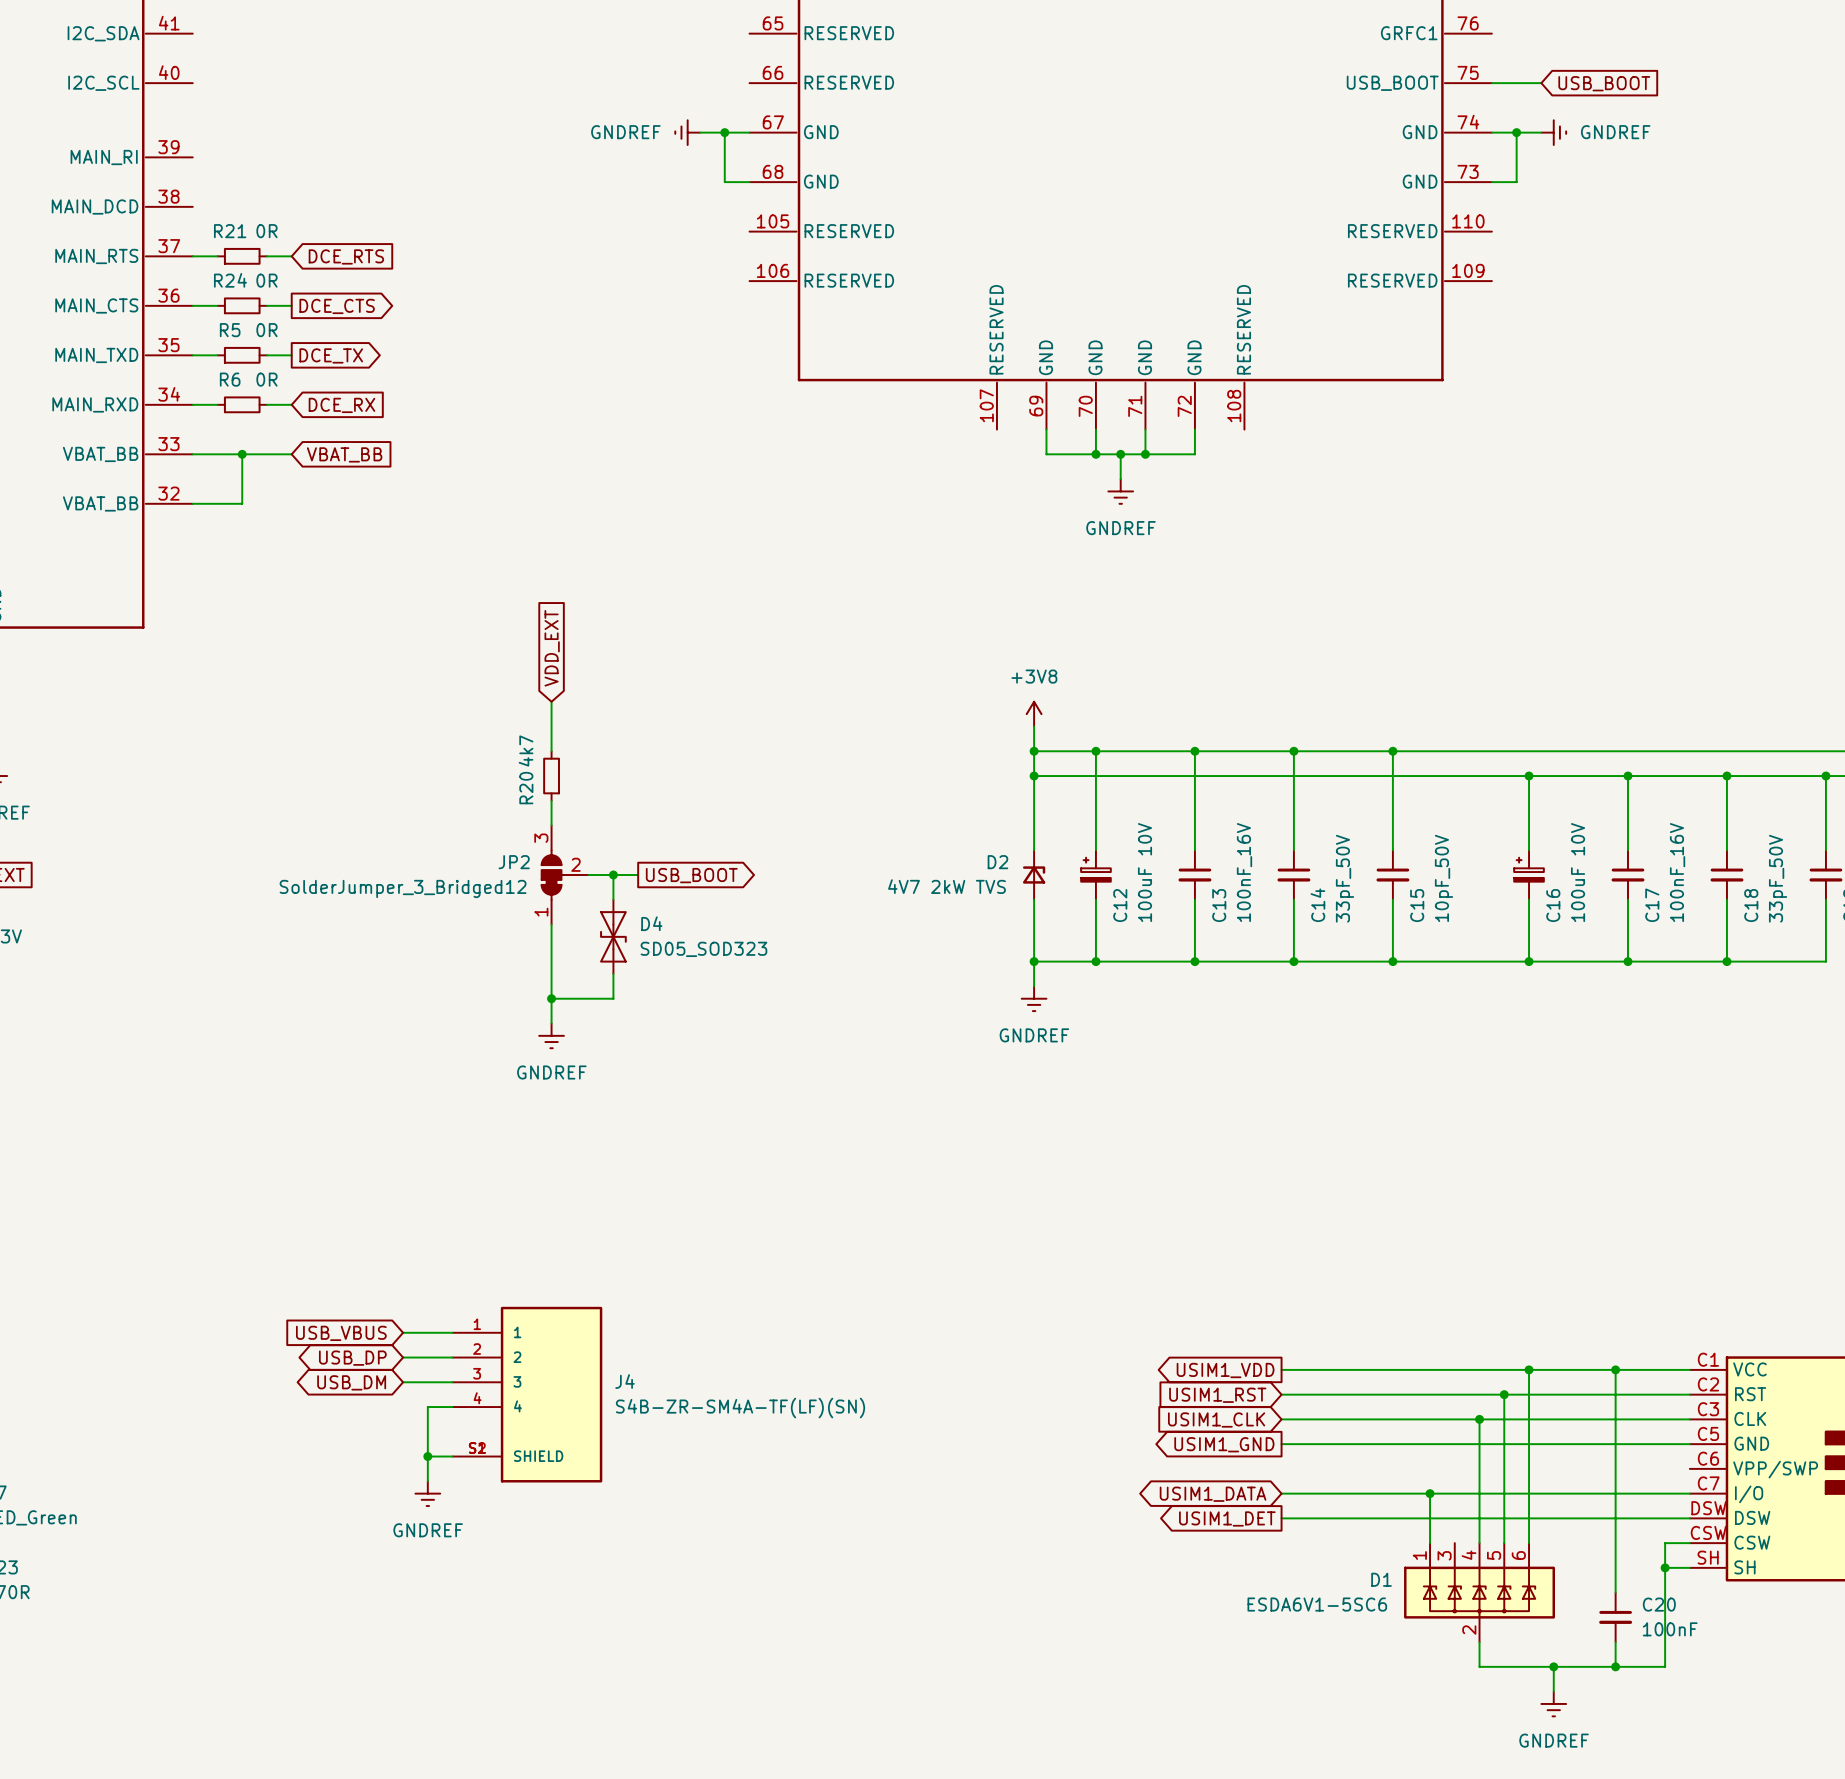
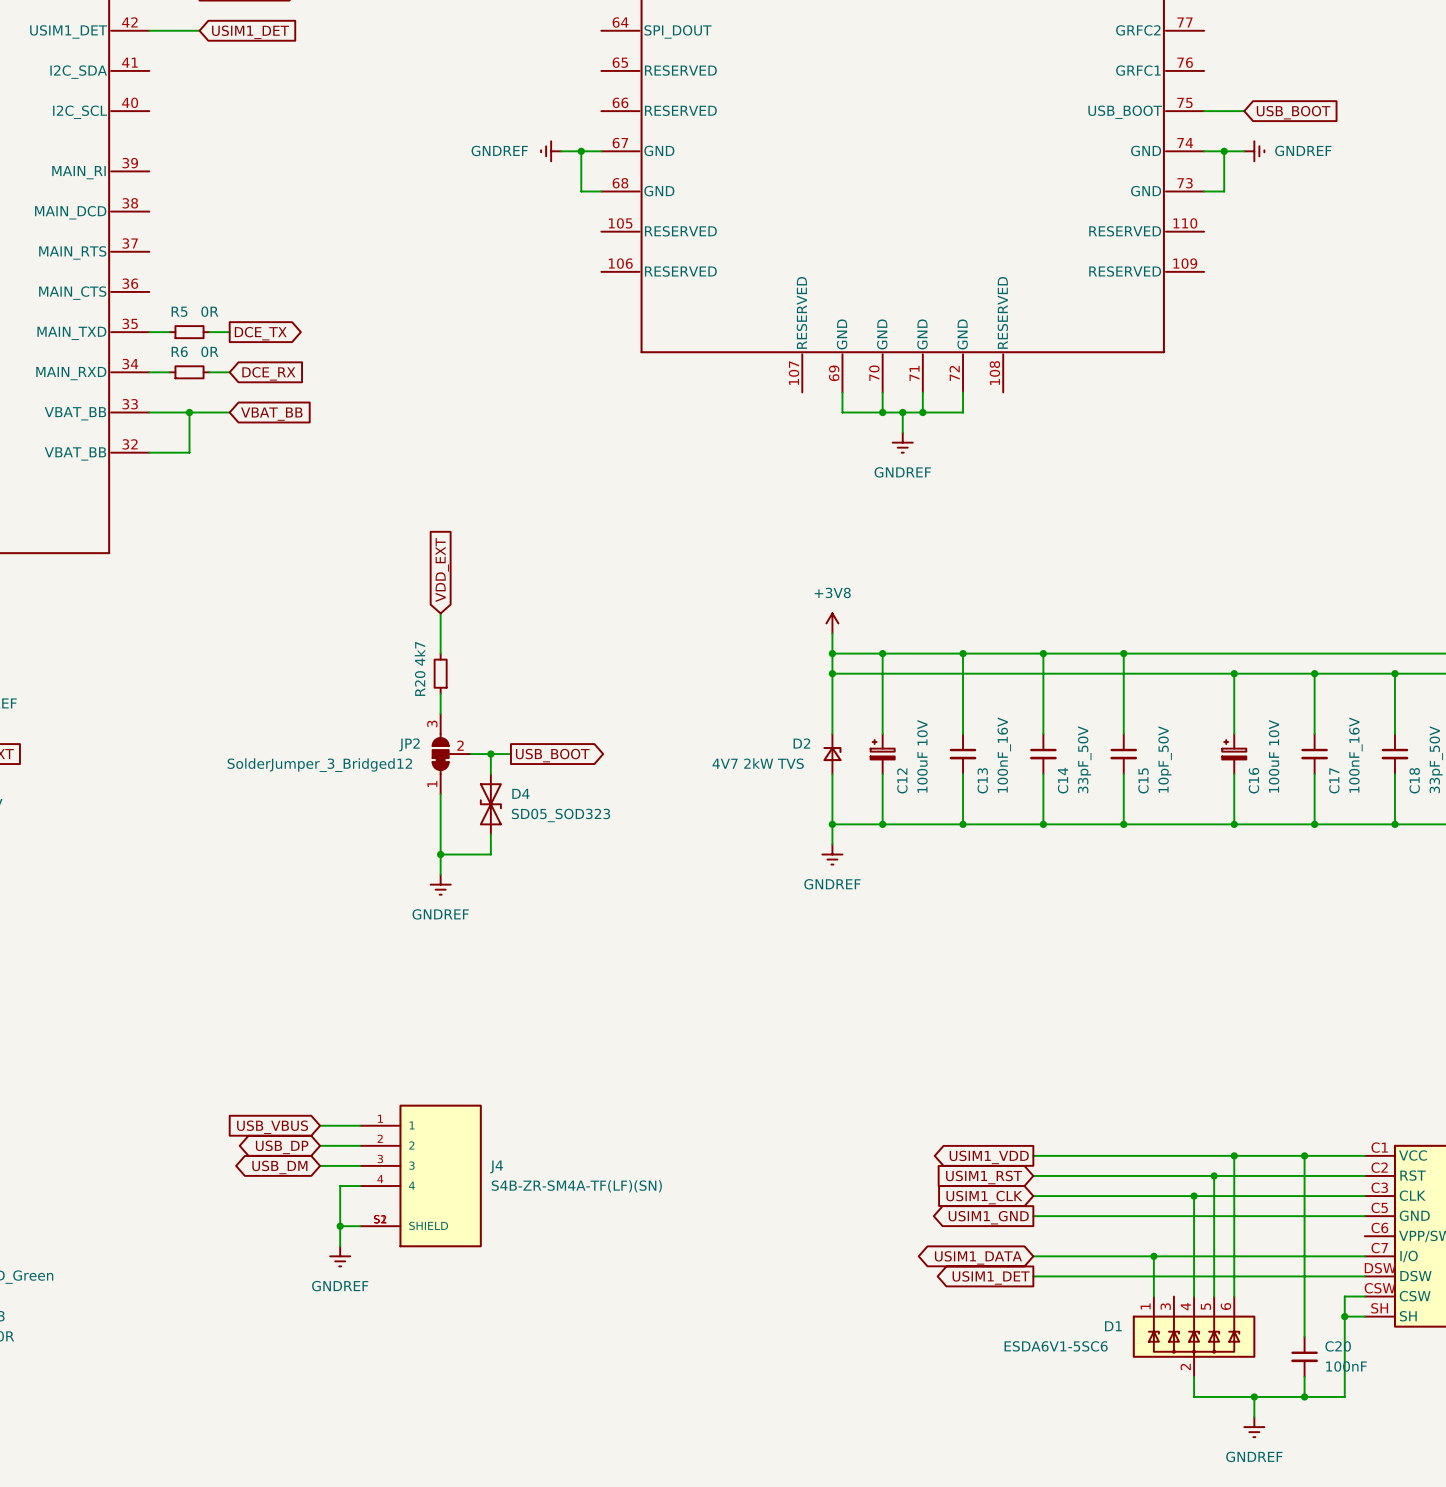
wire: (192, 256) (217, 256) -> none
R21: 0R (242, 256) -> none
wire: (266, 256) (291, 256) -> none
global label: DCE_RTS (346, 256) -> none
wire: (192, 305) (217, 305) -> none
R24: 0R (242, 305) -> none
wire: (266, 305) (291, 305) -> none
global label: DCE_CTS (337, 306) -> none

